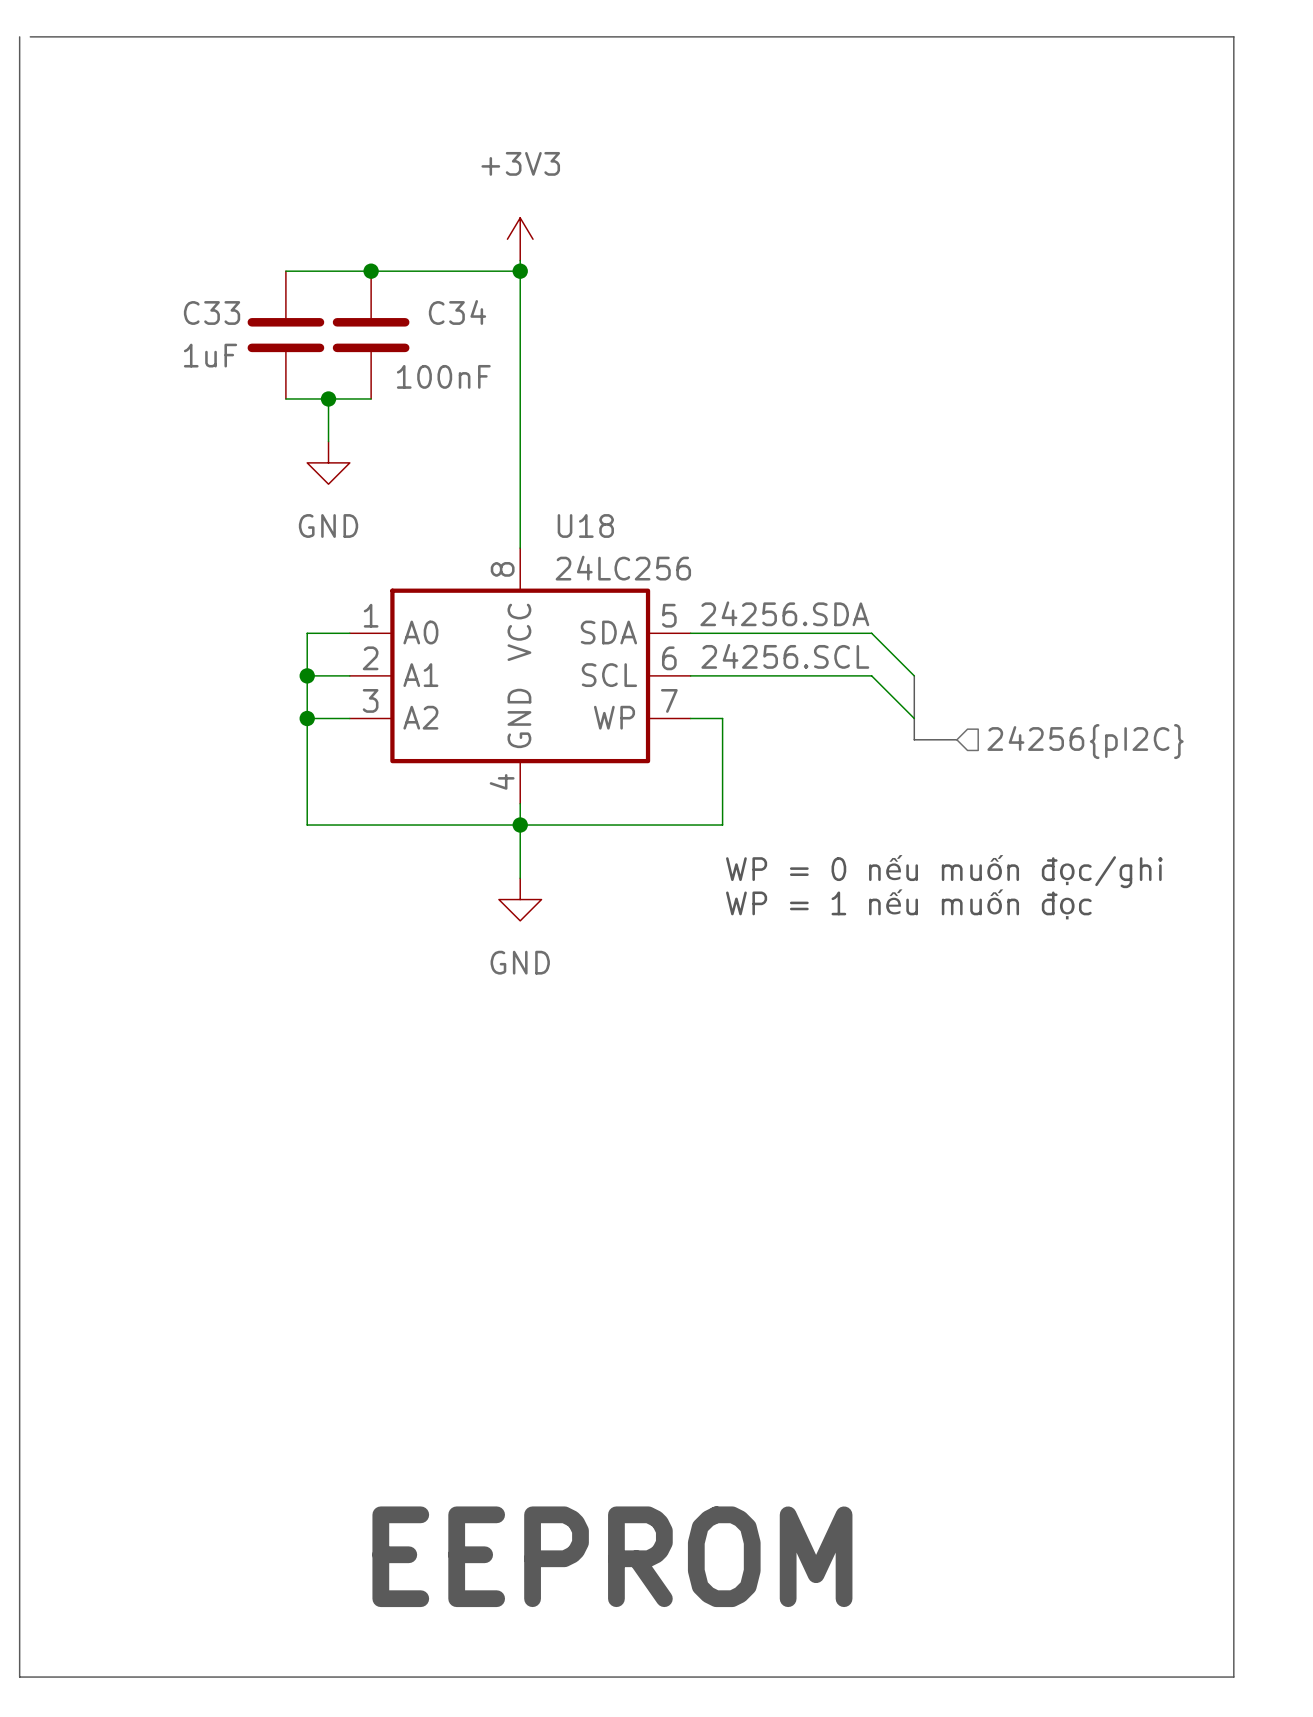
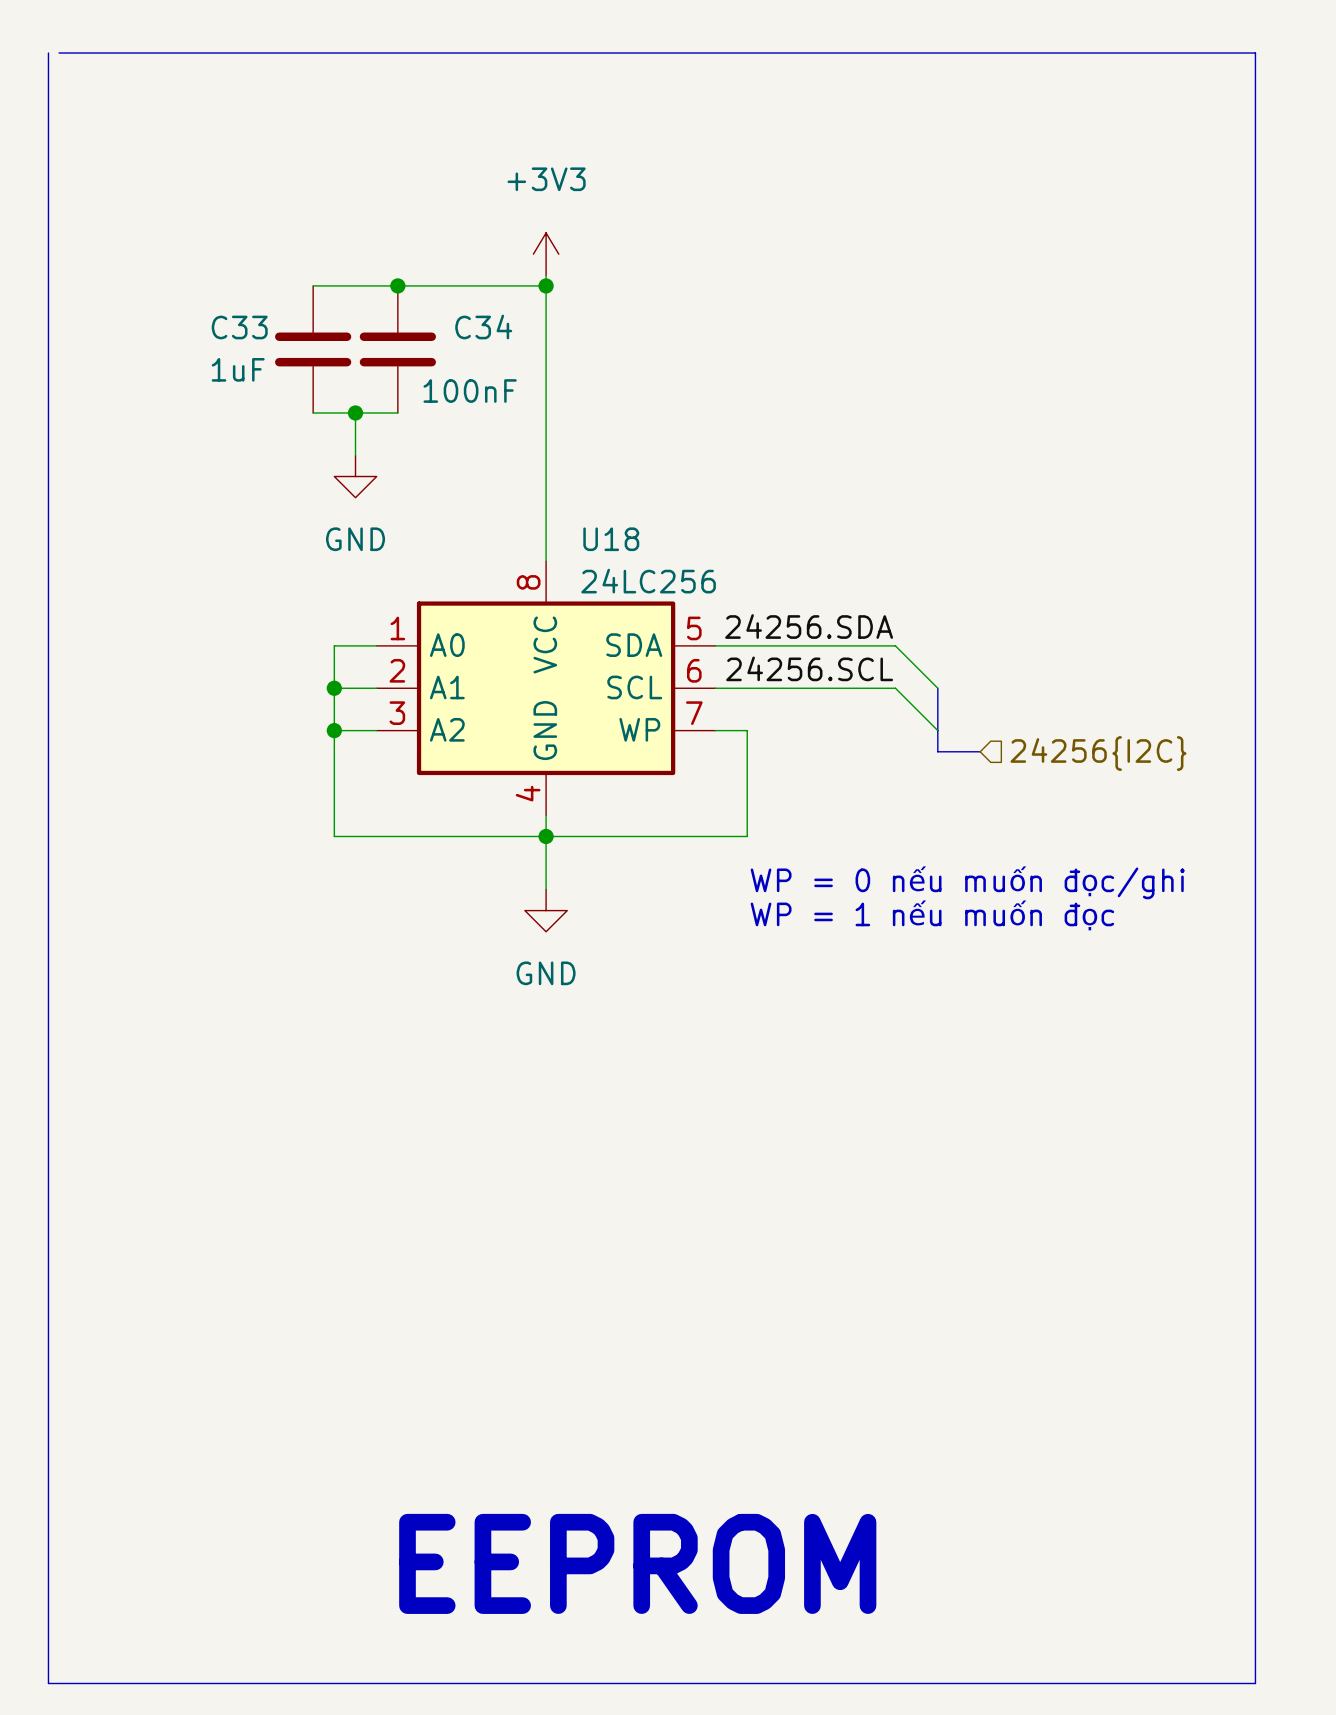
hierarchical label: 24256{pI2C} (1085, 741) -> 24256{I2C} (1098, 753)

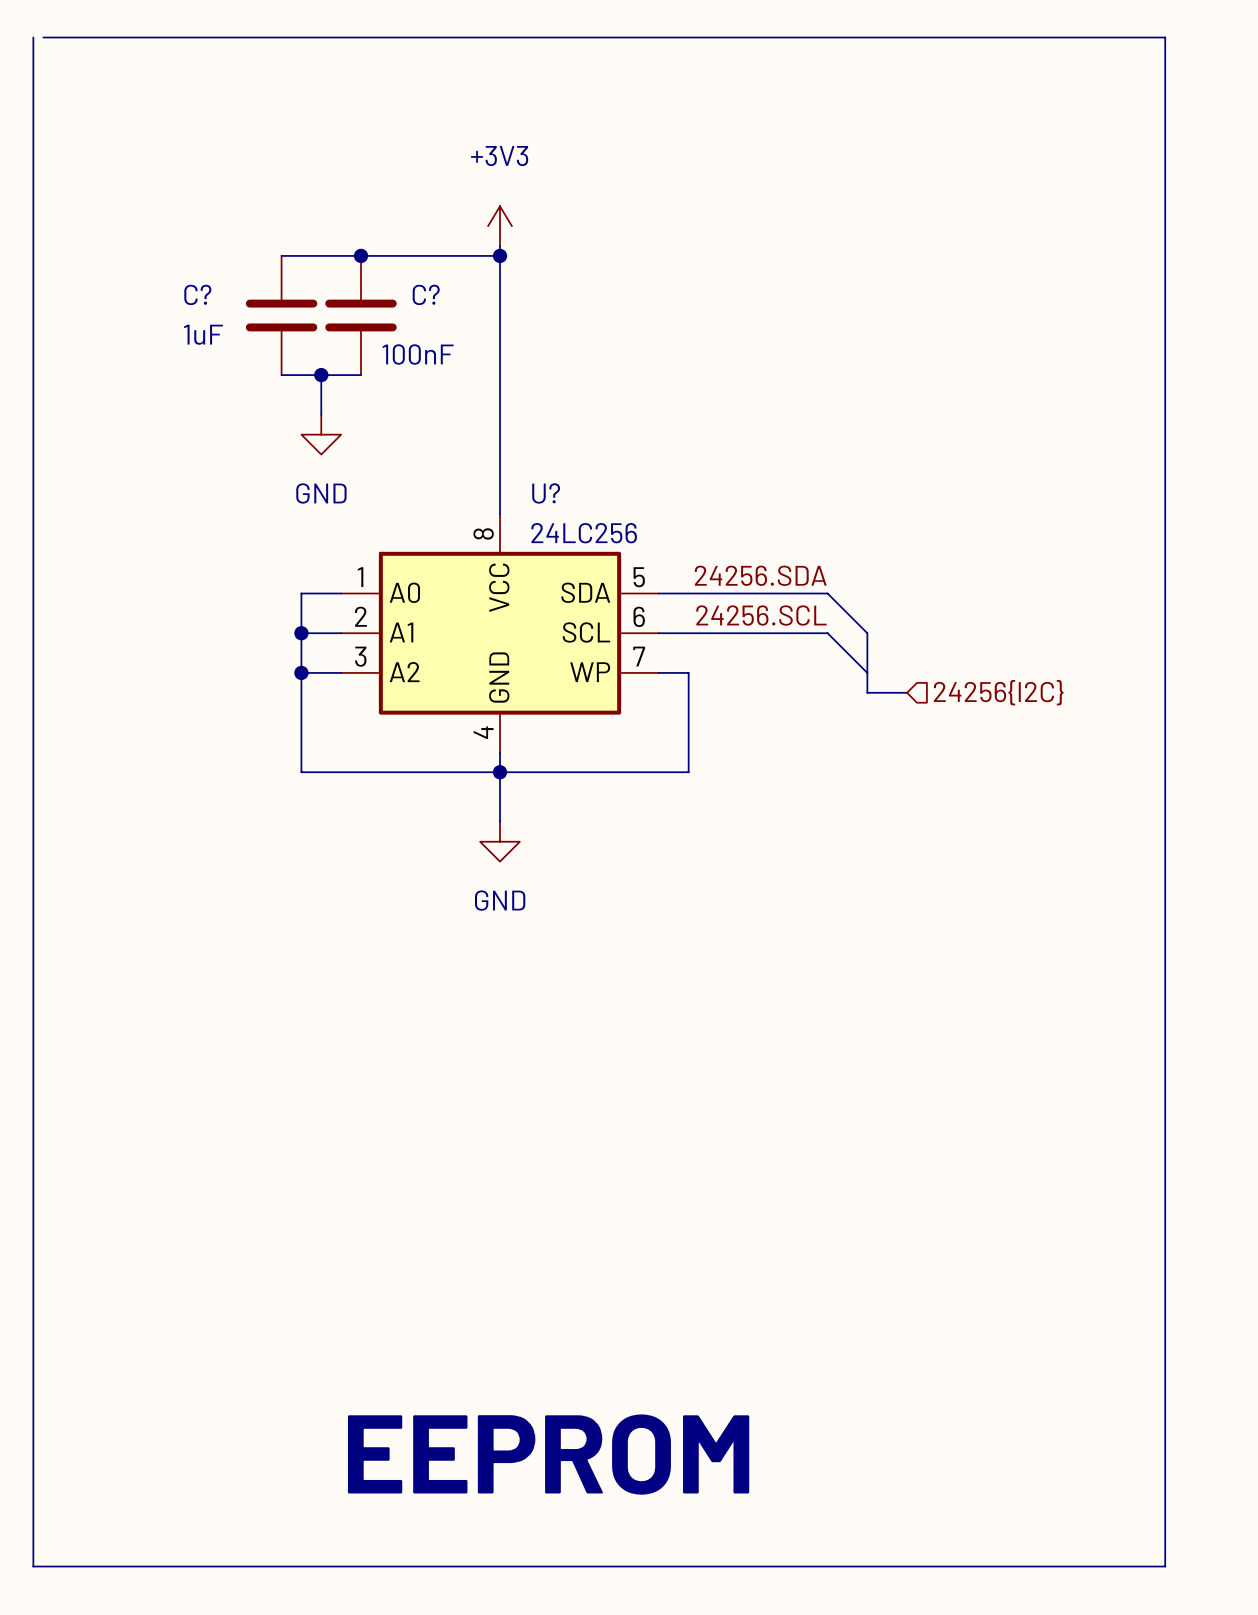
C34 name: C34 (483, 326) -> C? (426, 294)
C33 name: C33 (239, 327) -> C? (197, 294)
U18 name: U18 (611, 539) -> U? (546, 493)
text: WP = 0 nếu muốn đọc/ghi (967, 882) -> none
text: WP = 1 nếu muốn đọc (932, 915) -> none

